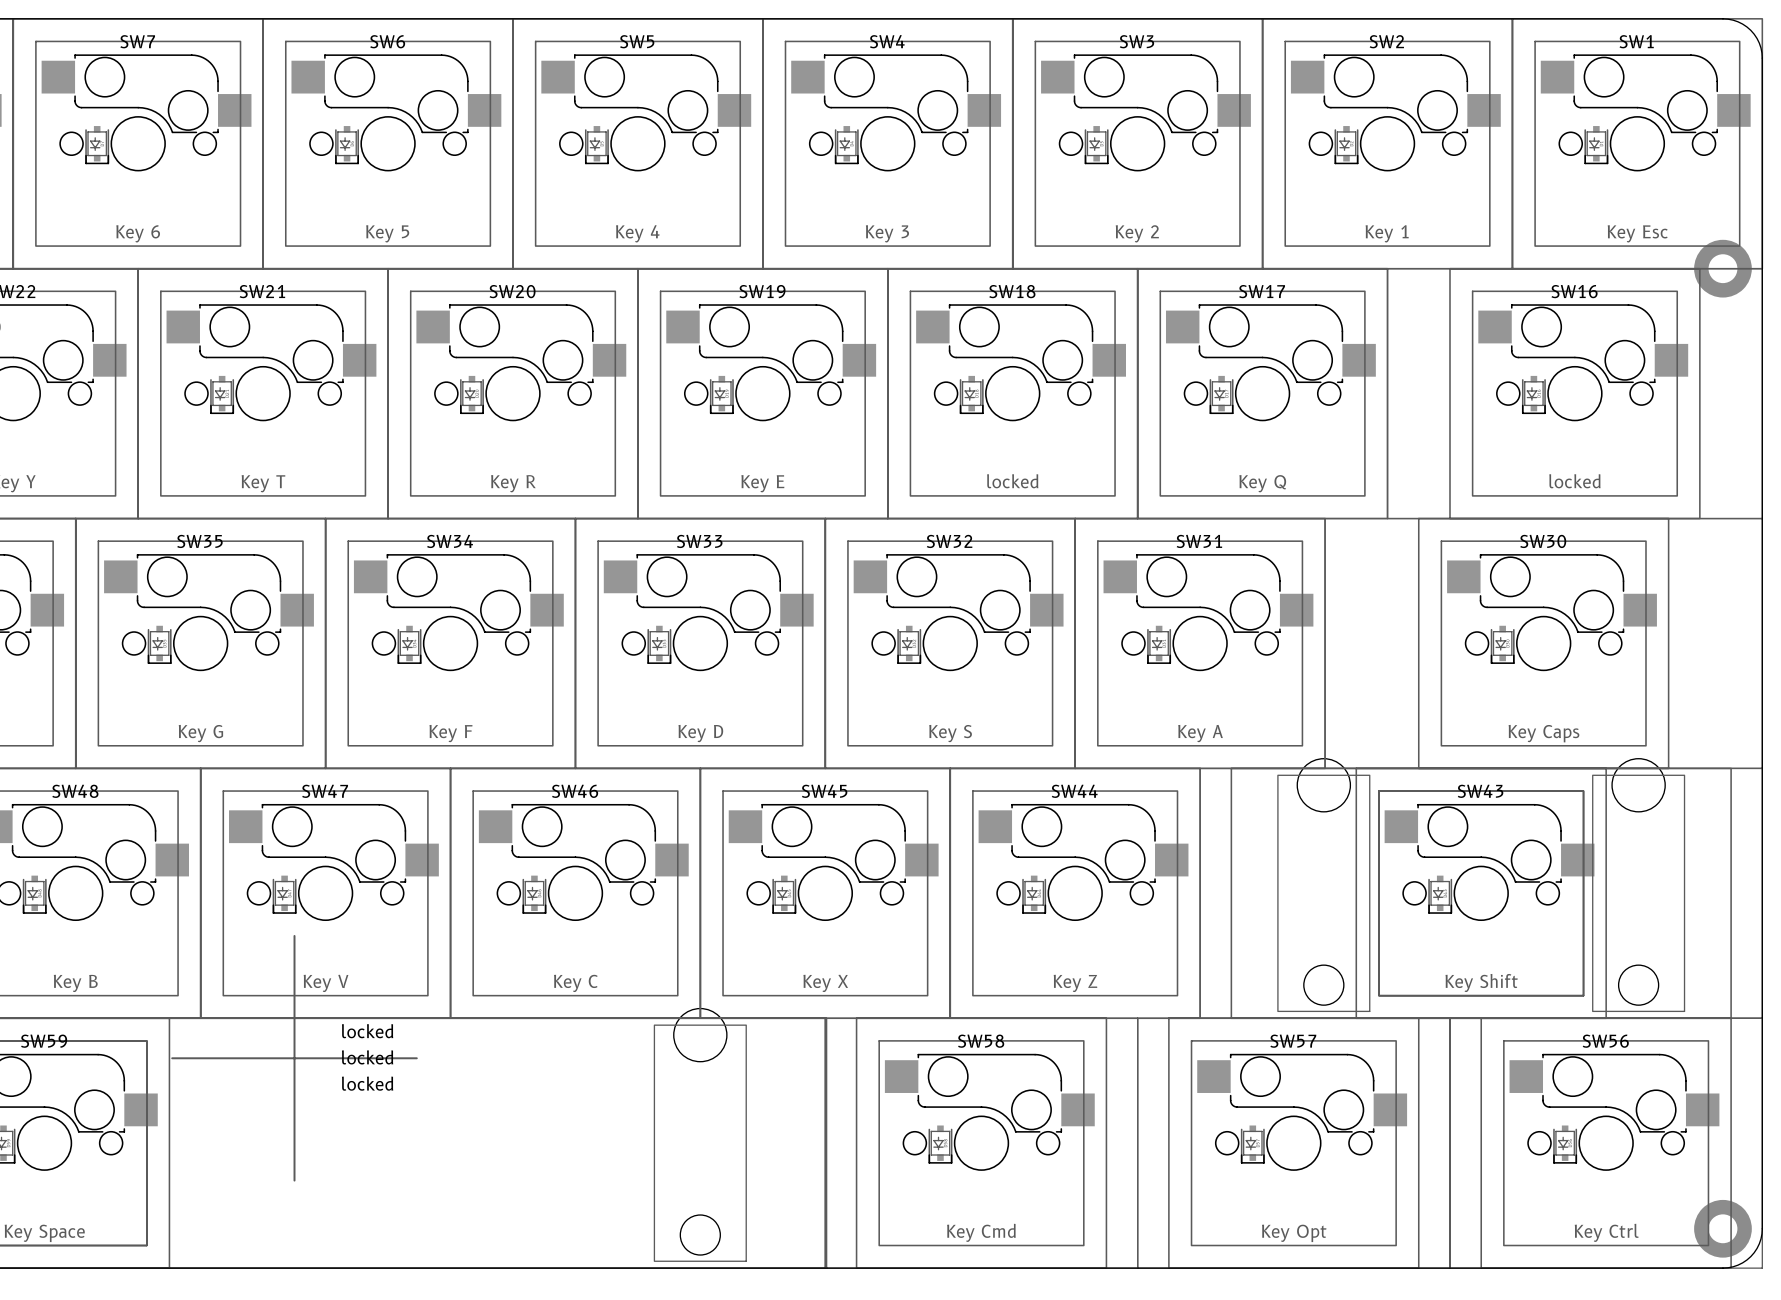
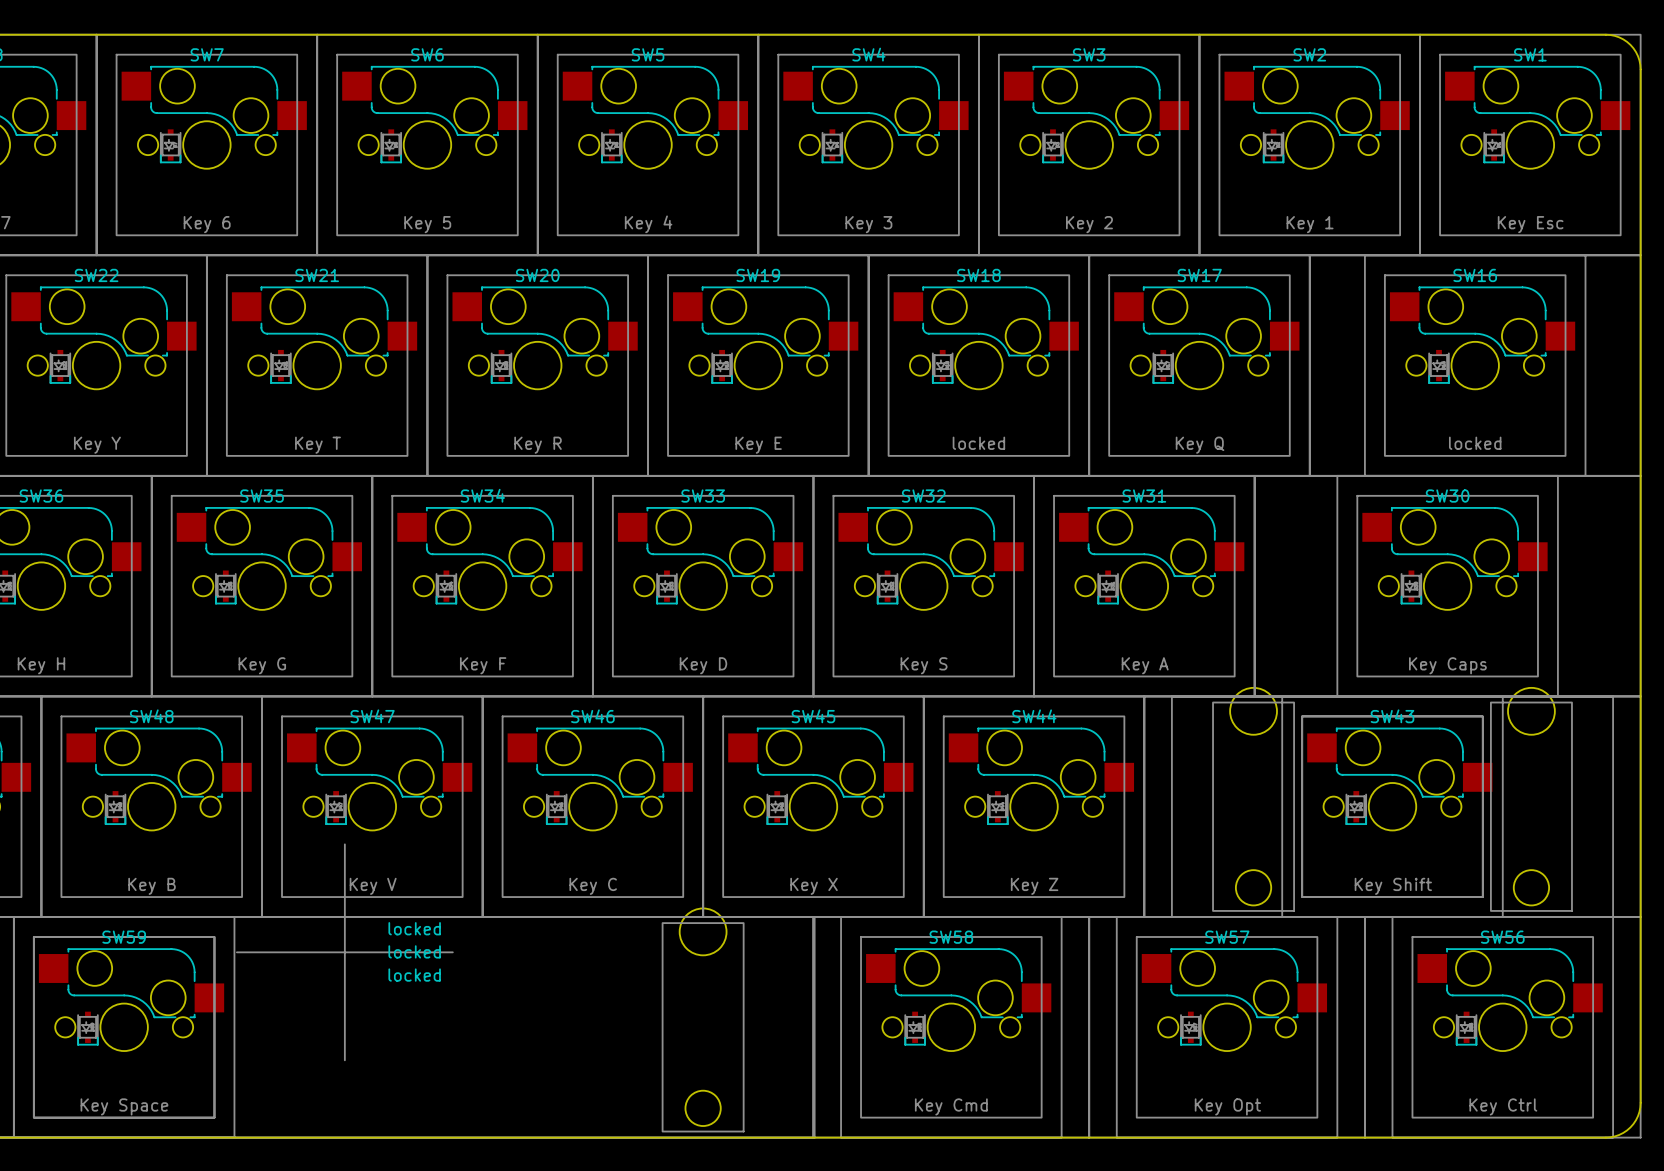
part: (1722, 268) -> none
part: (1722, 1228) -> none

